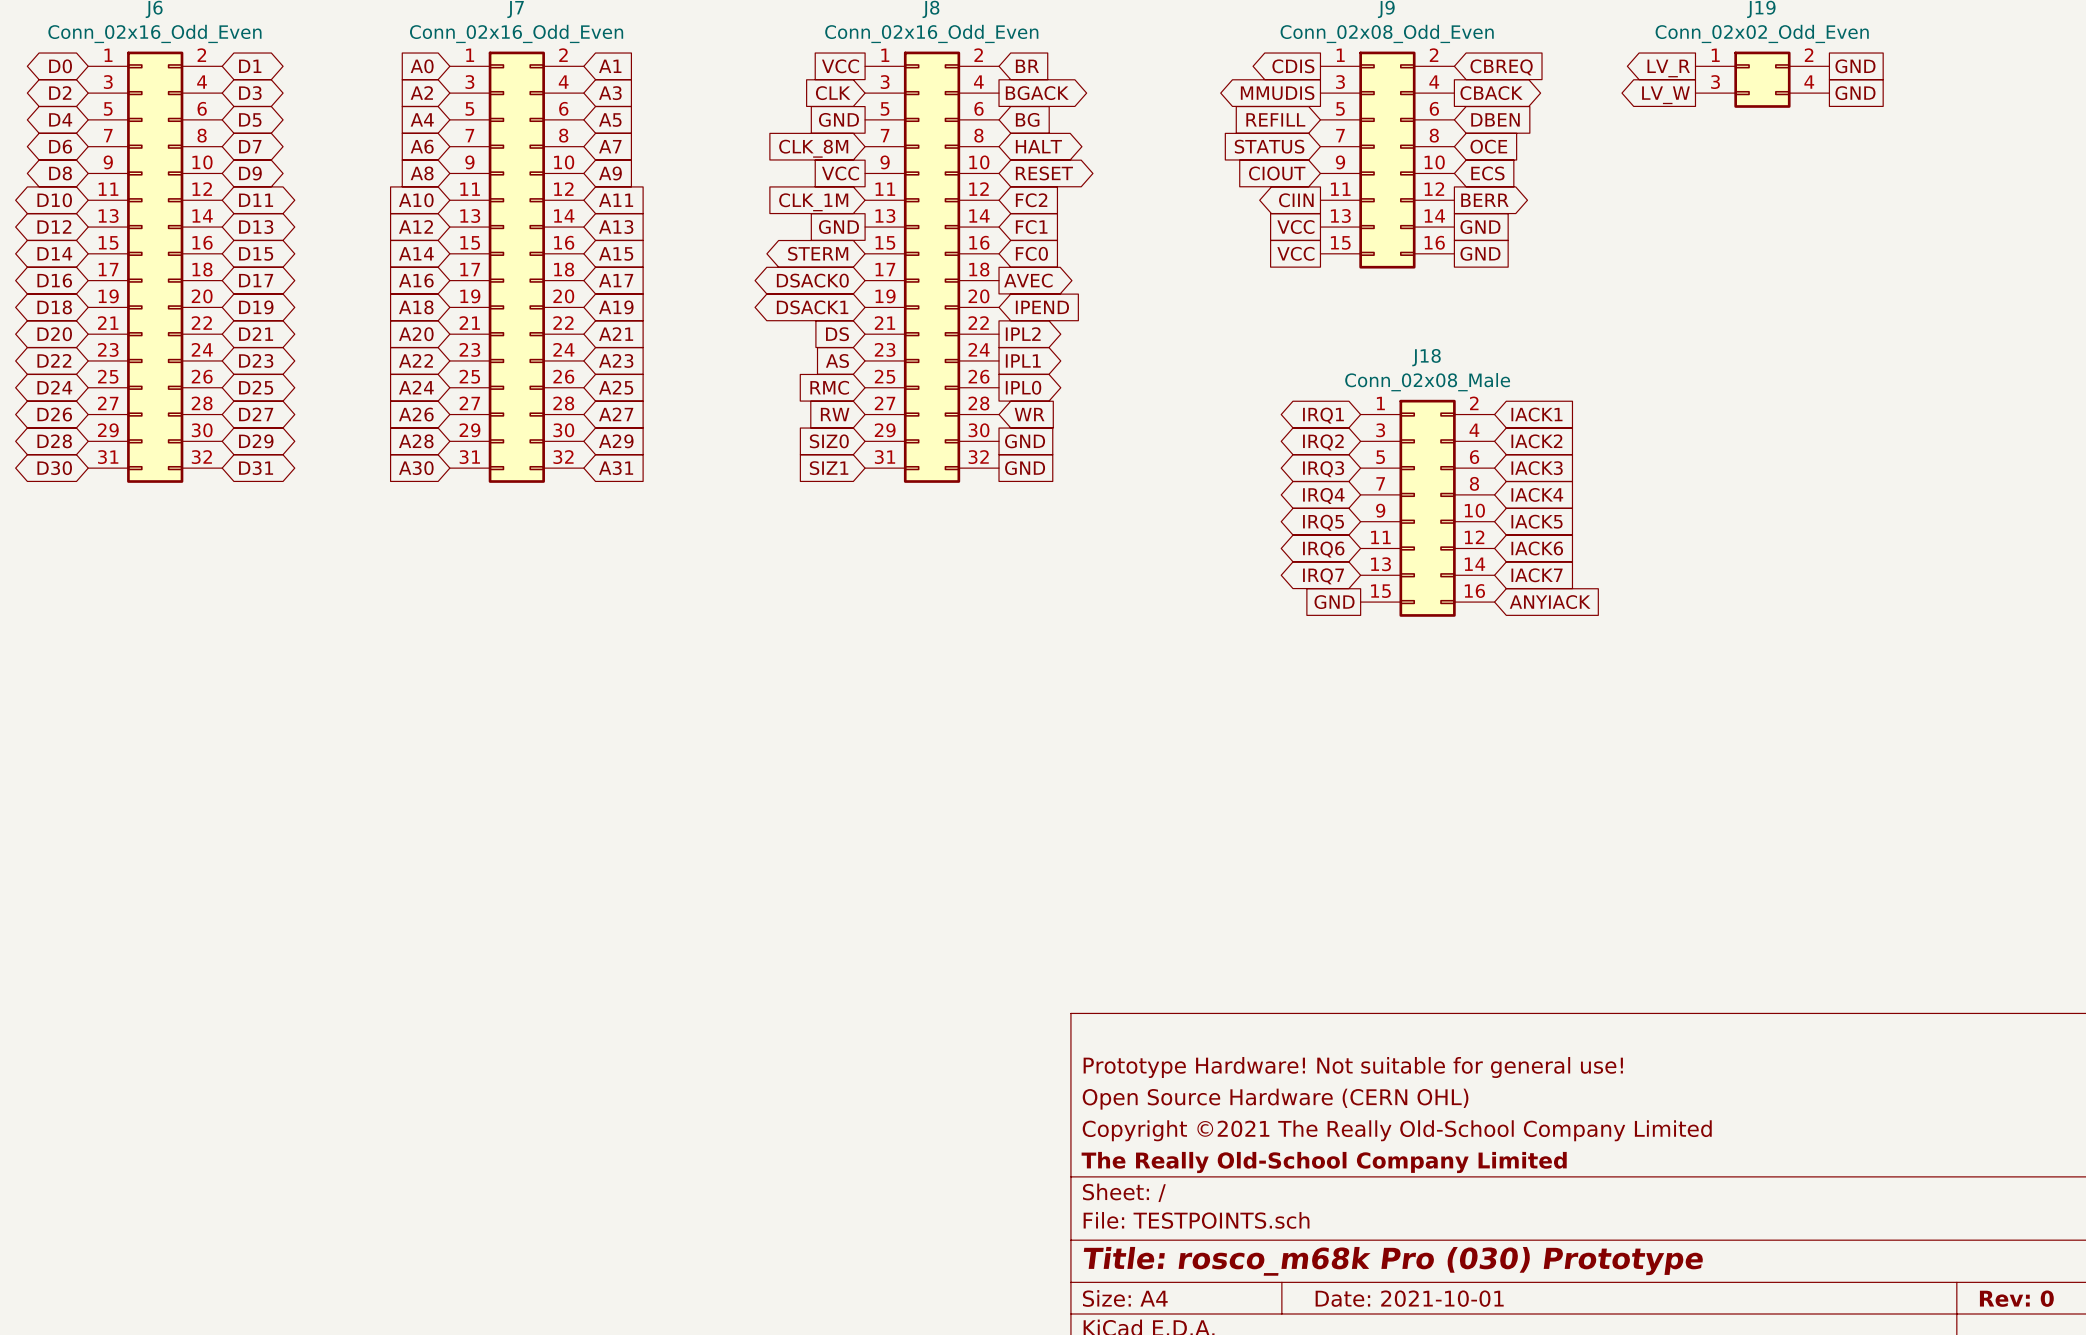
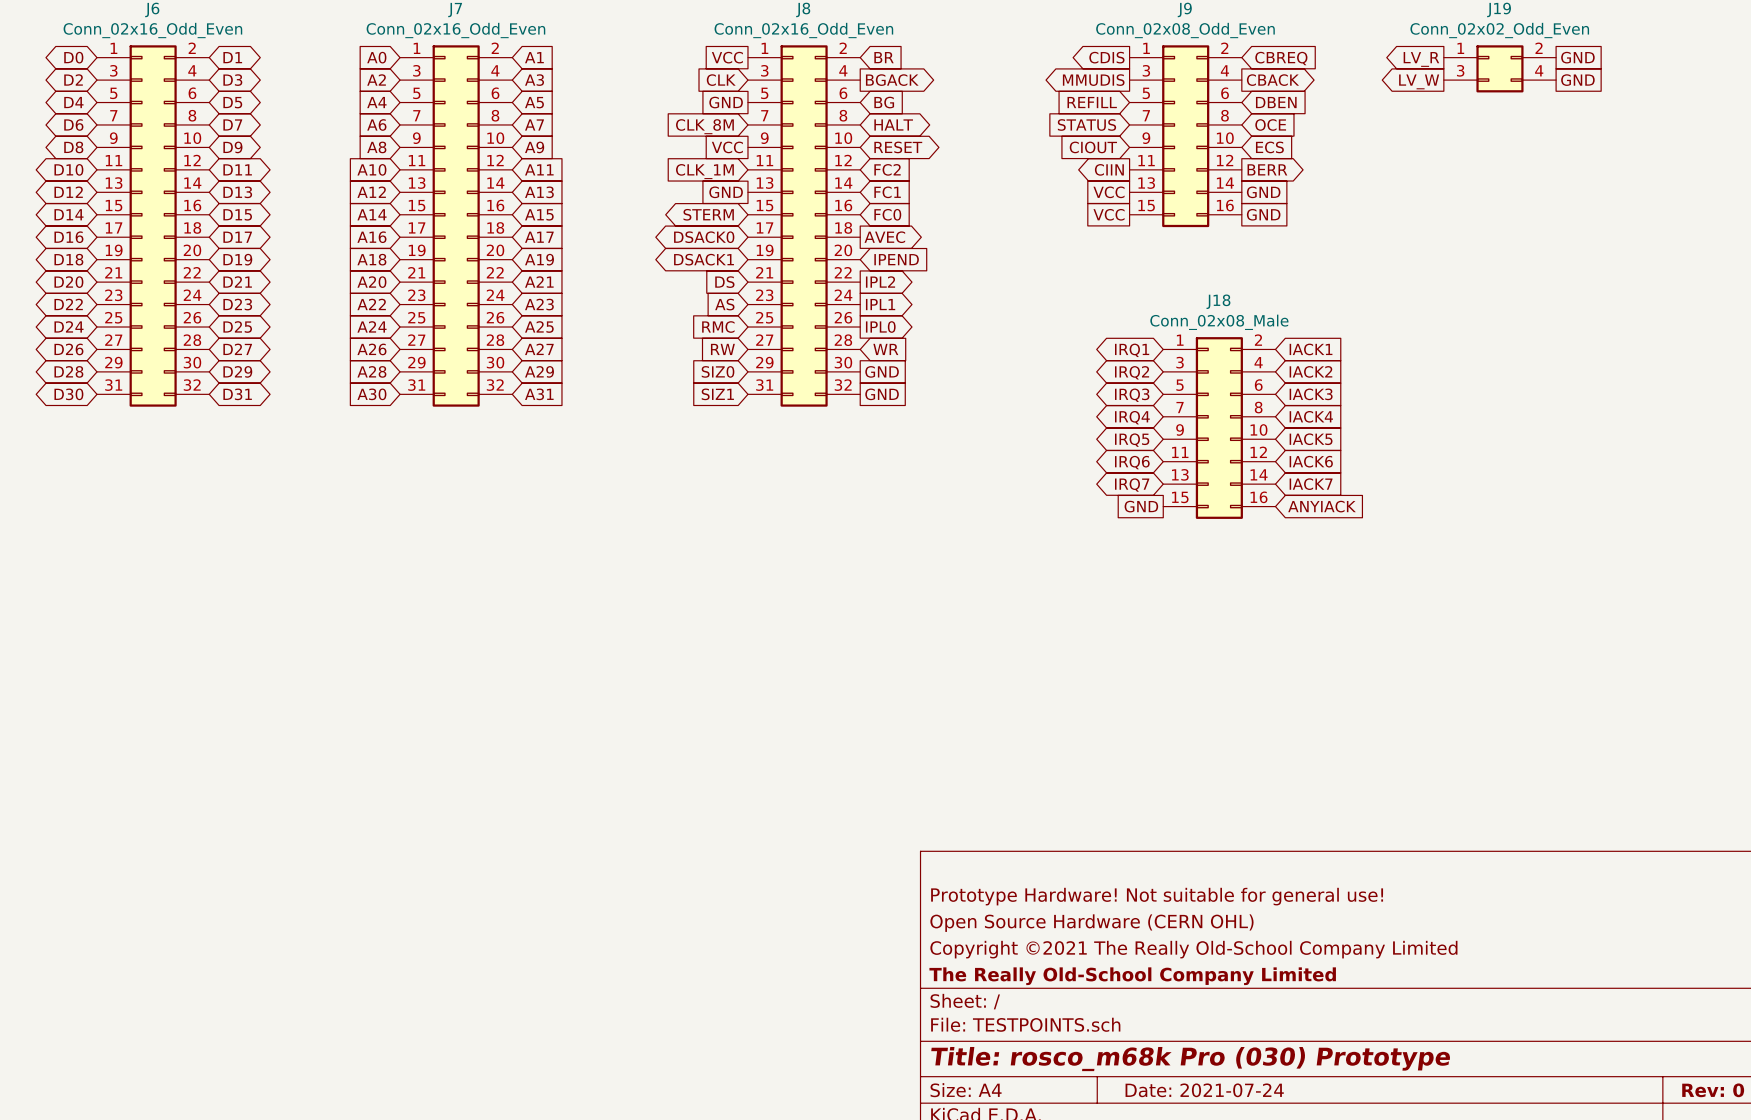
title block: Date: 2021-10-01 (1409, 1298) -> Date: 2021-07-24 (1204, 1090)

